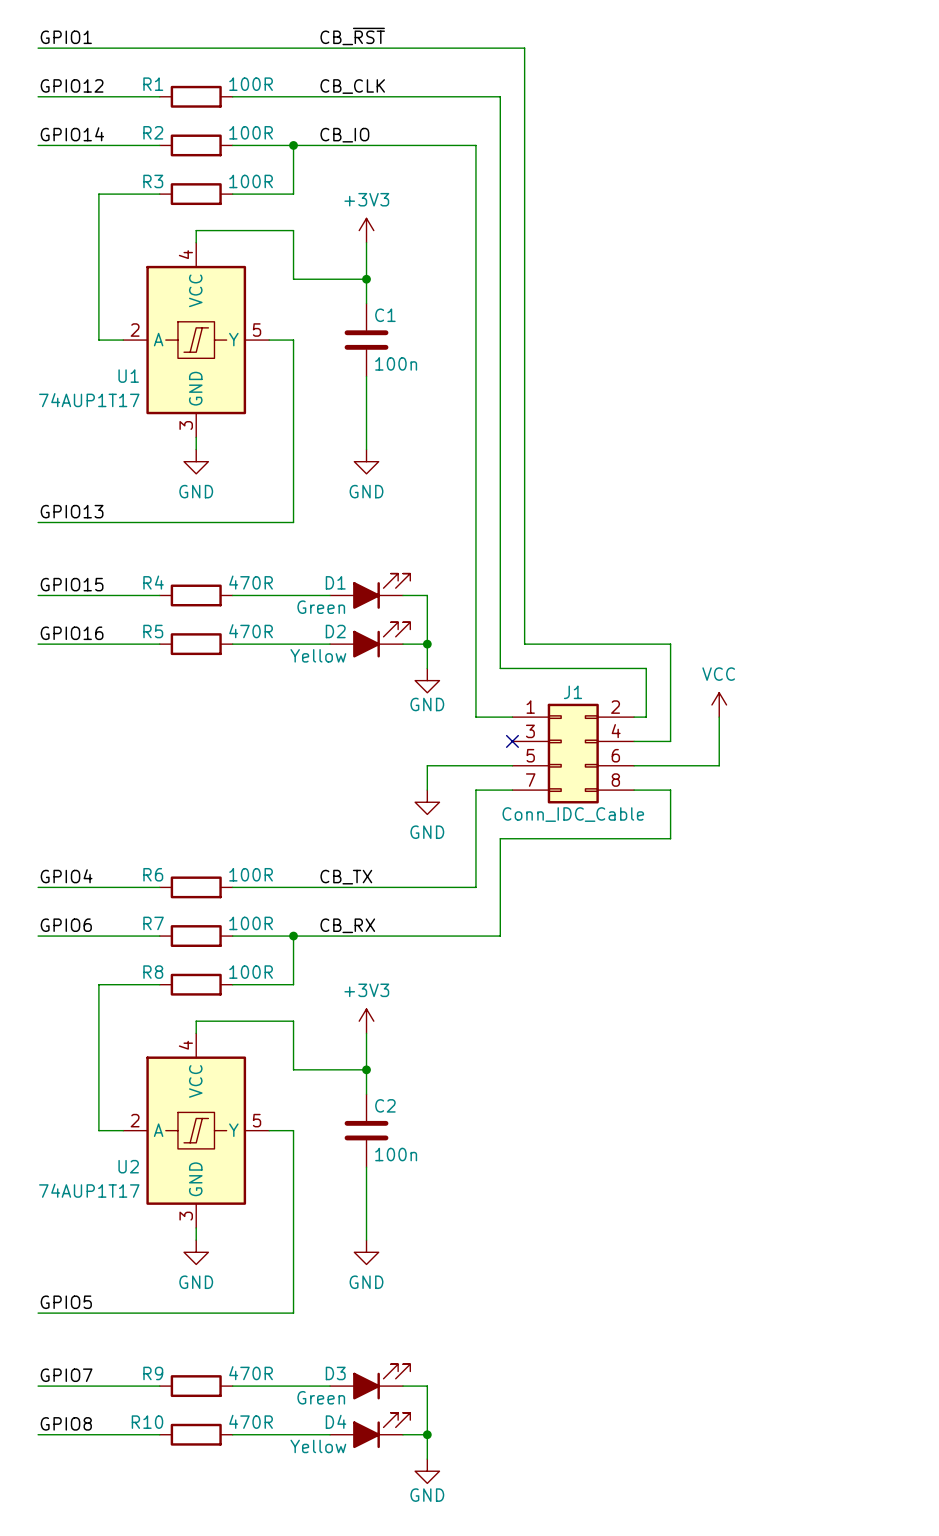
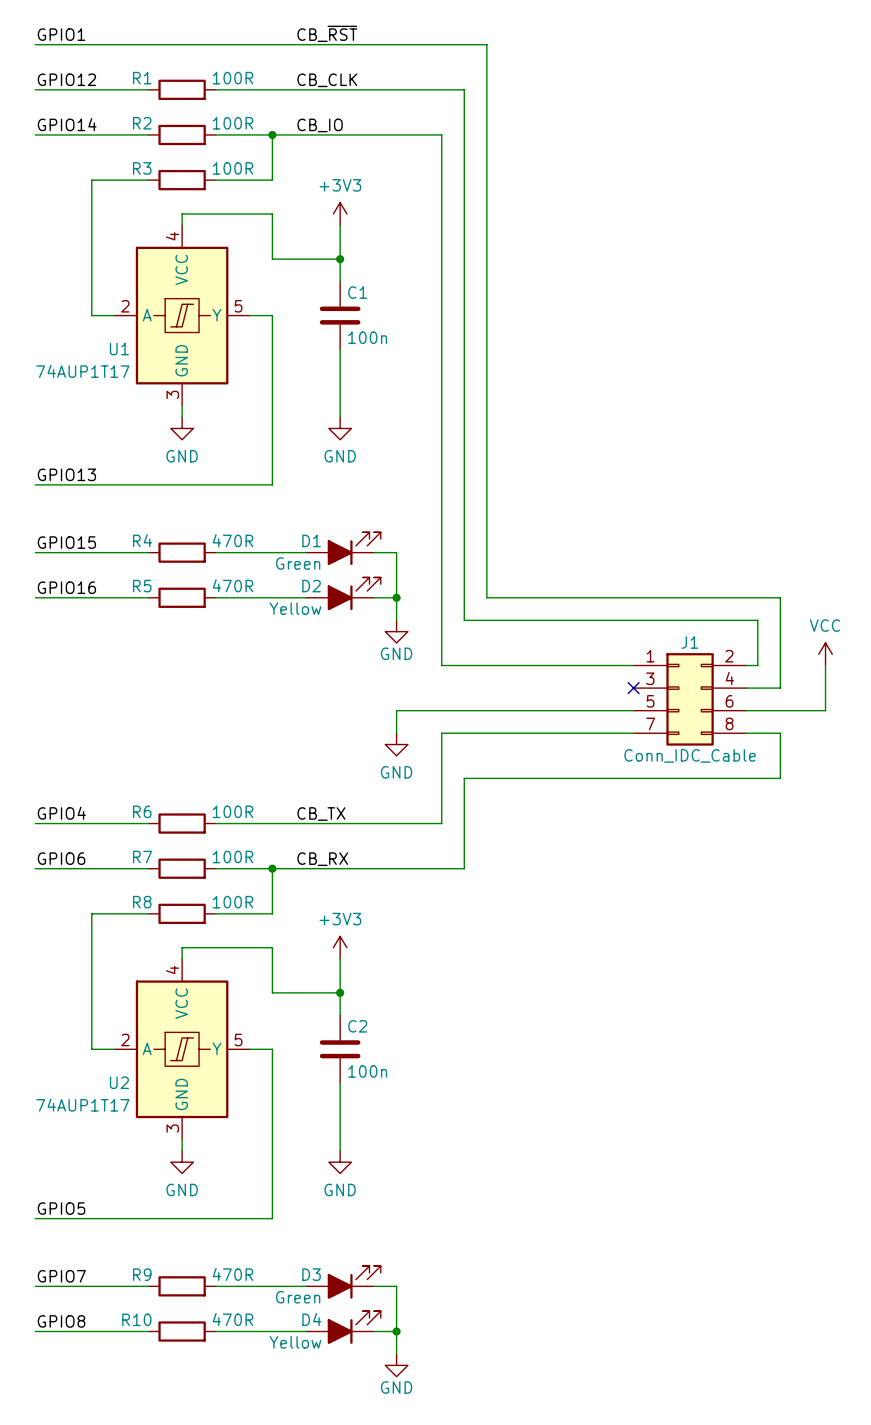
wire: (670, 644) (670, 741) (634, 741) -> (622, 597) (780, 597) (780, 688) (746, 688)
wire: (646, 668) (646, 717) -> (633, 665) (599, 665)
wire: none -> (599, 620) (757, 620) (757, 665) (746, 665)
power symbol position: VCC (719, 704) -> VCC (825, 654)
wire: none -> (825, 665) (825, 710) (746, 710)
no-connect mark: (512, 741) -> none
no-connect mark: none -> (633, 688)
J1 position: (573, 753) -> (690, 699)
wire: (670, 790) (670, 838) -> (622, 733) (633, 733)
wire: none -> (746, 733) (780, 733) (780, 778) (622, 778)

